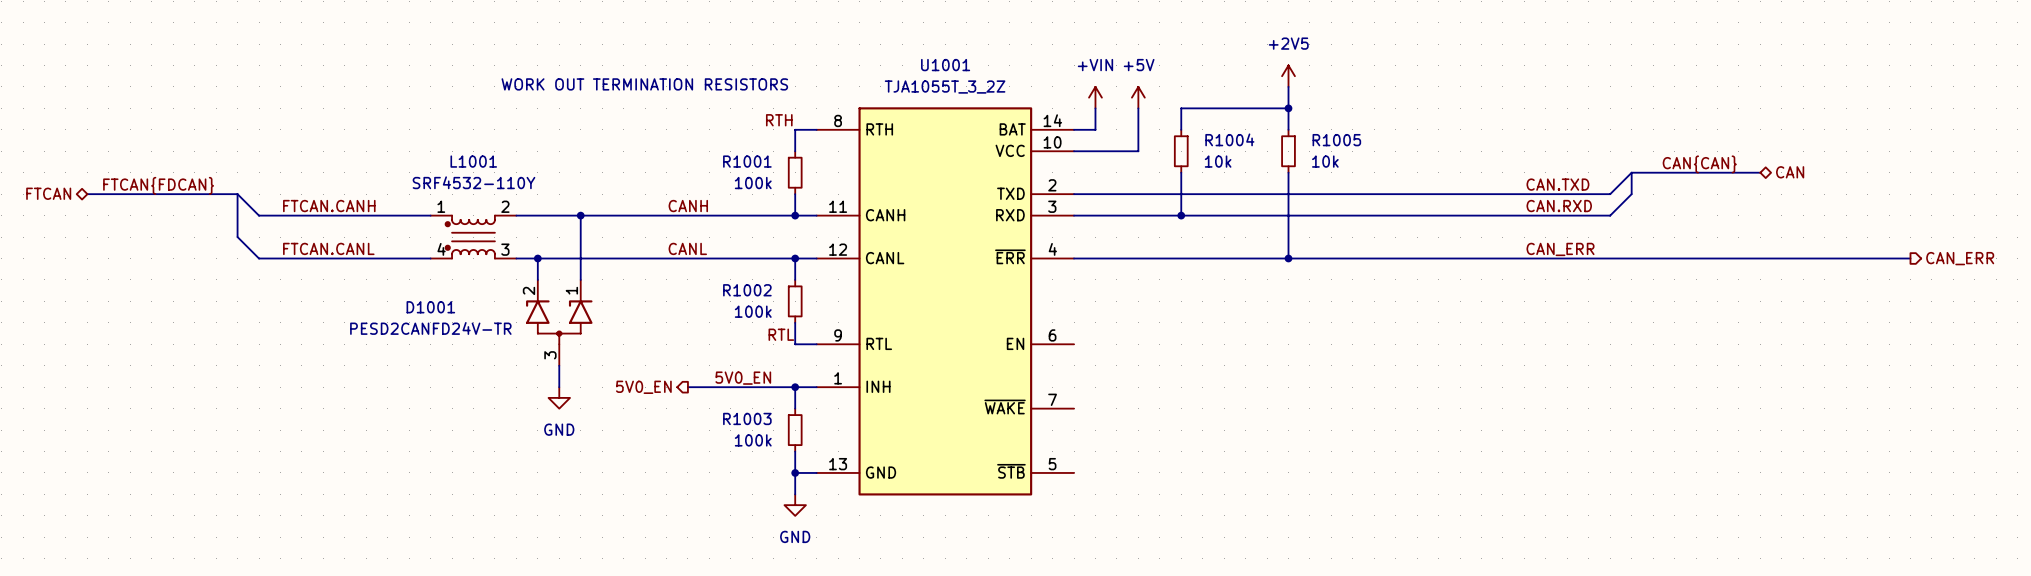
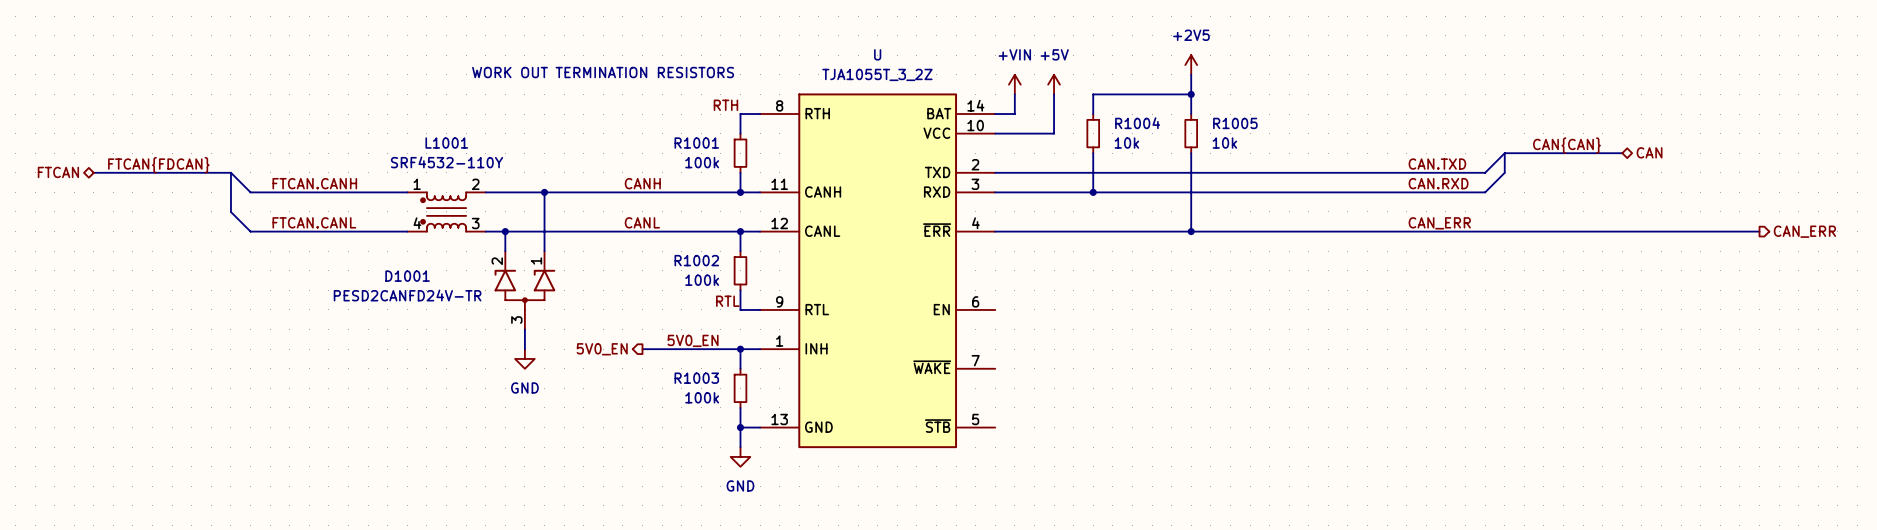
U1001 name: U1001 (945, 65) -> U (877, 54)

